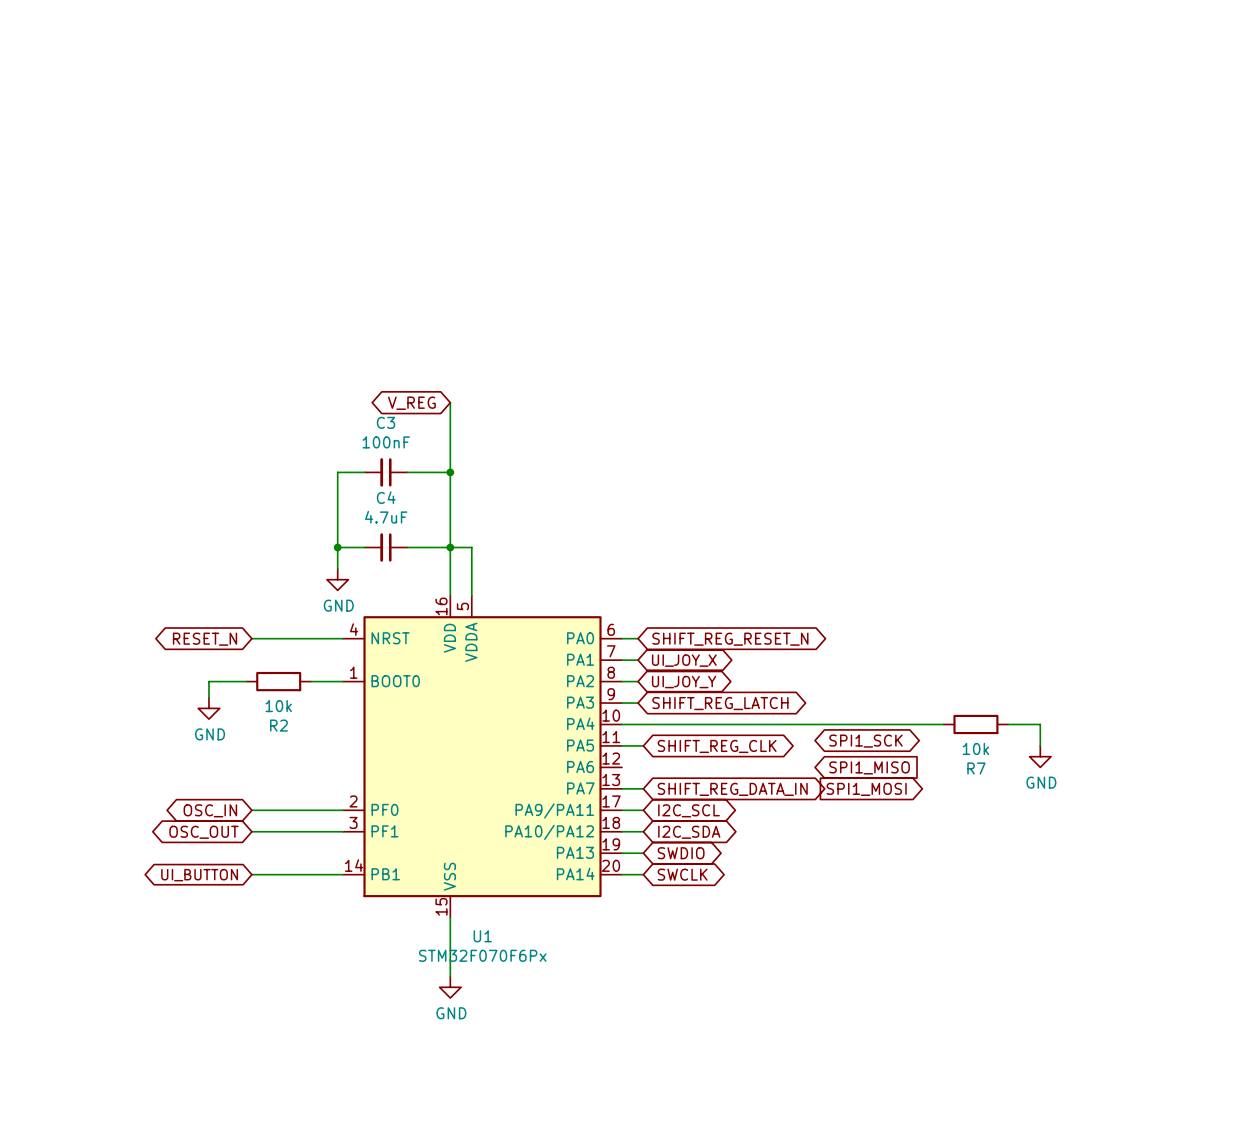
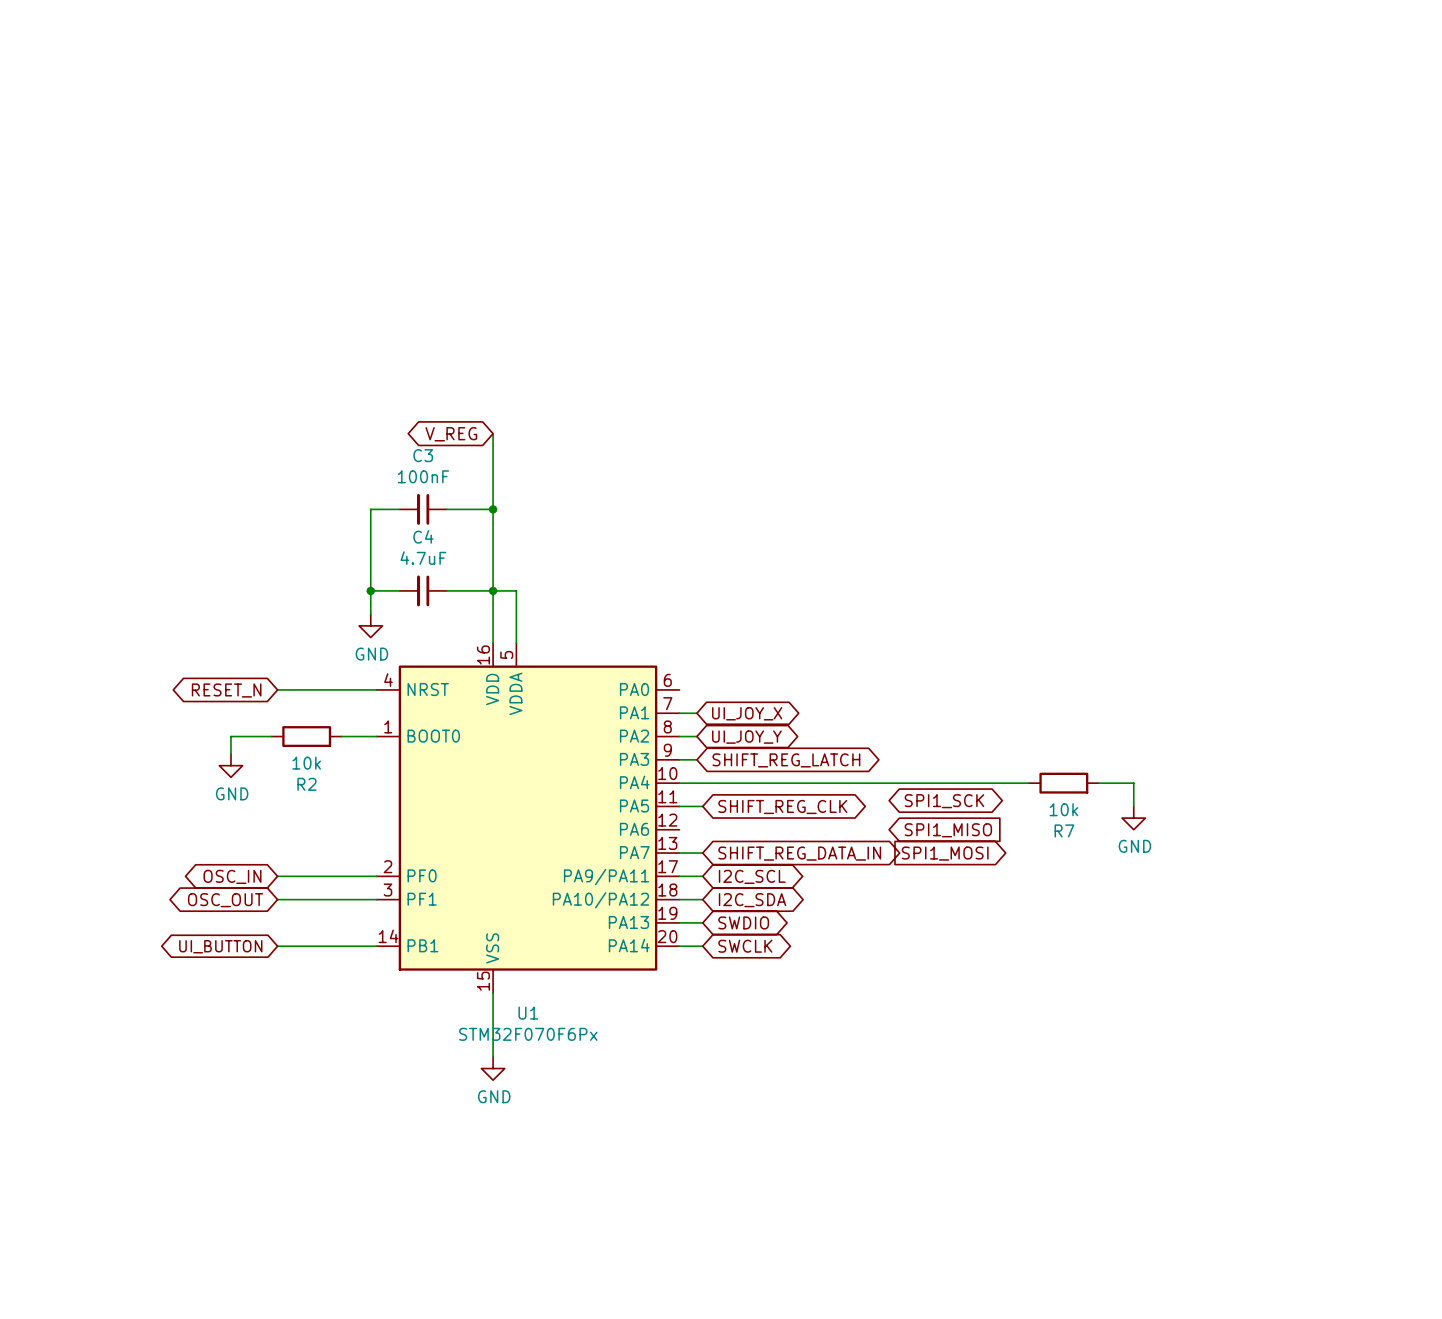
wire: (621, 638) (638, 638) -> none
global label: SHIFT_REG_RESET_N (730, 639) -> none

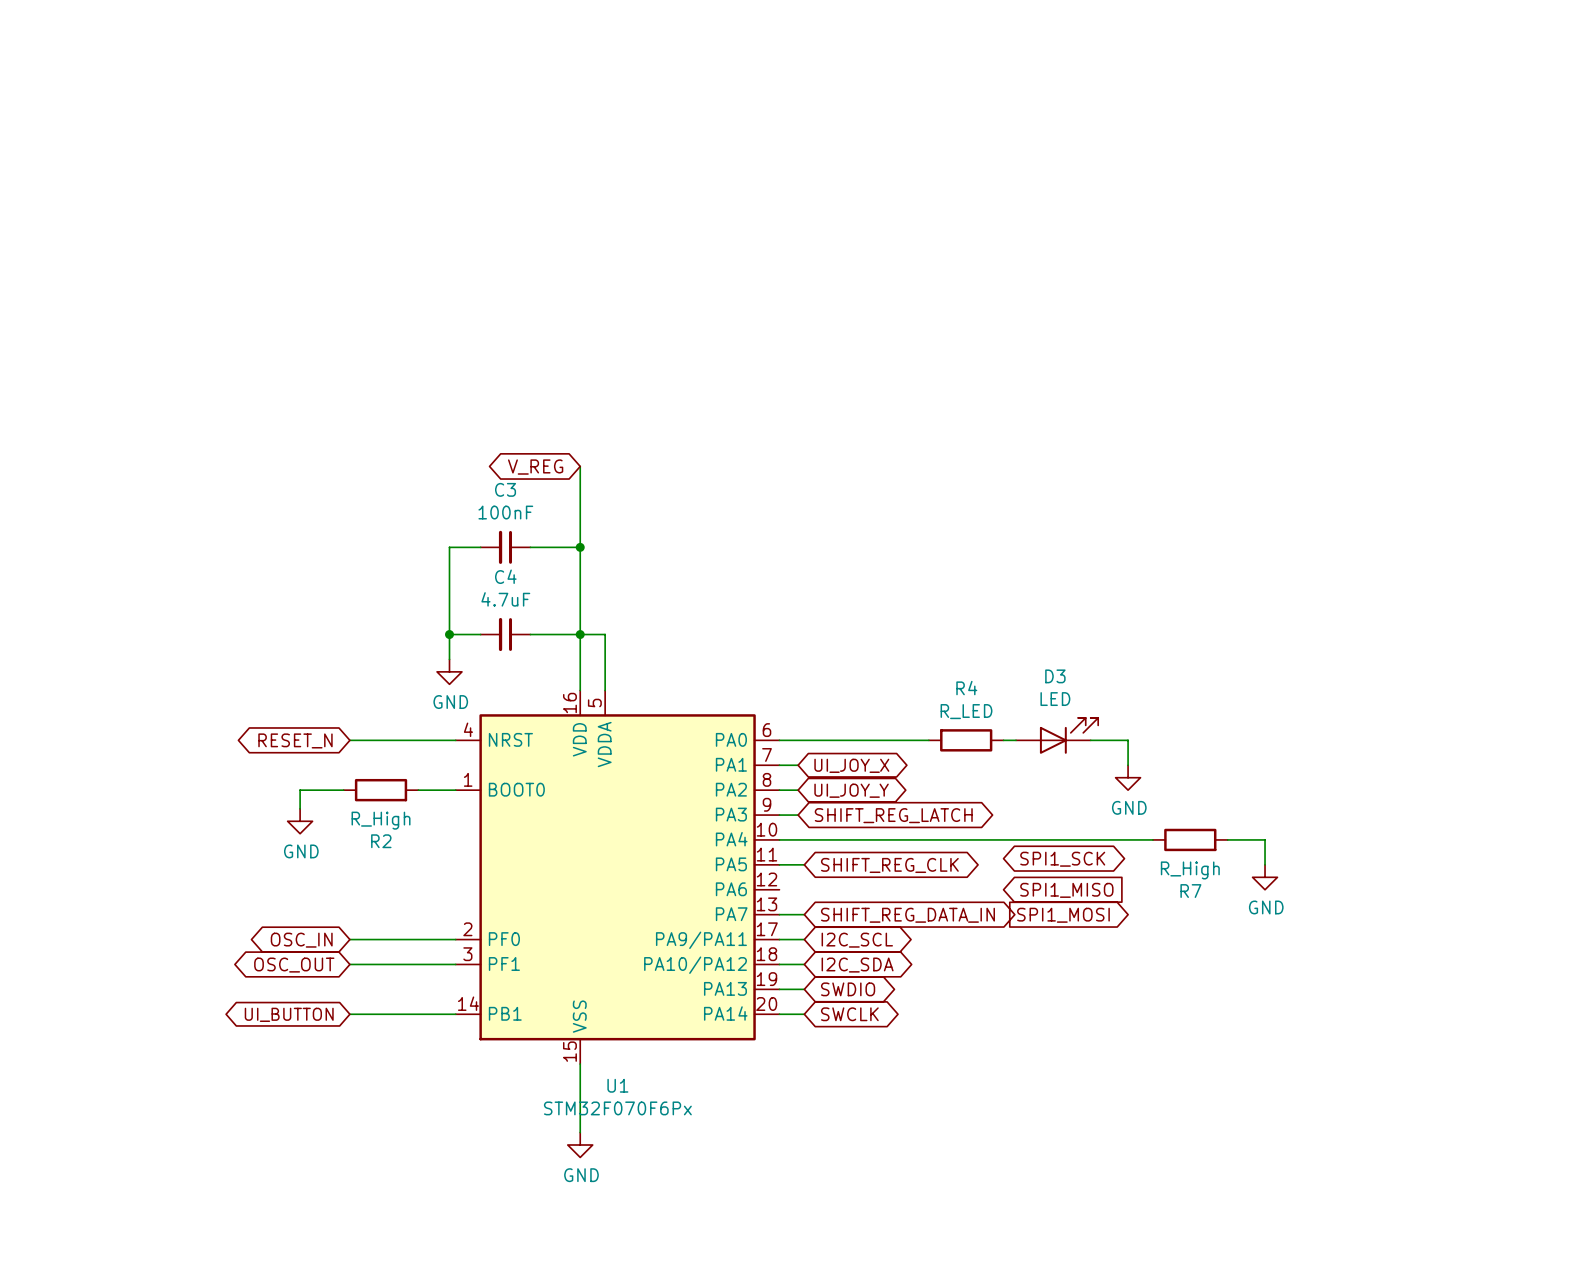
D3: none -> LED (1057, 735)
wire: none -> (779, 740) (928, 740)
R4: none -> R_LED (966, 740)
wire: none -> (1003, 740) (1016, 740)
wire: none -> (1090, 740) (1128, 740) (1128, 765)
power symbol: none -> GND (1128, 777)
R2 value: 10k (306, 763) -> R_High (381, 820)
R7 value: 10k (1063, 809) -> R_High (1190, 870)

